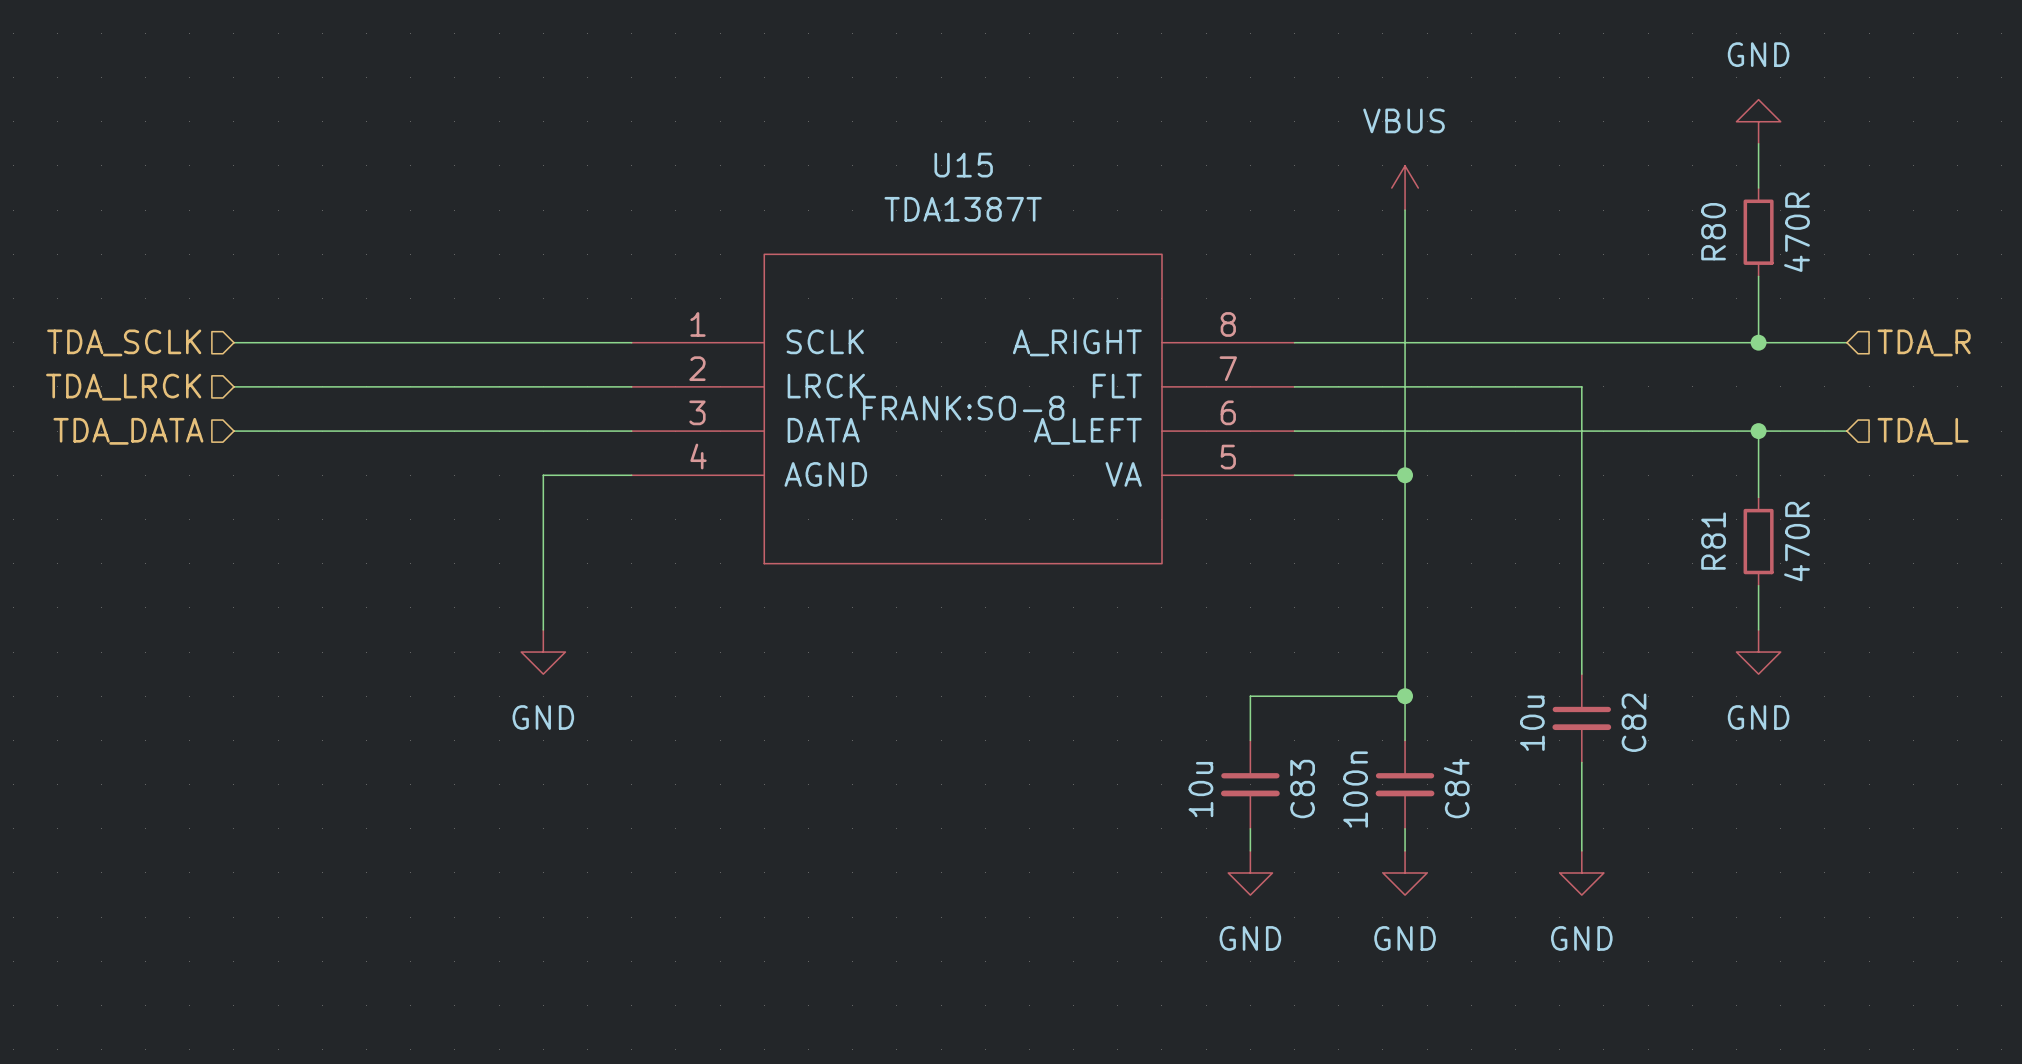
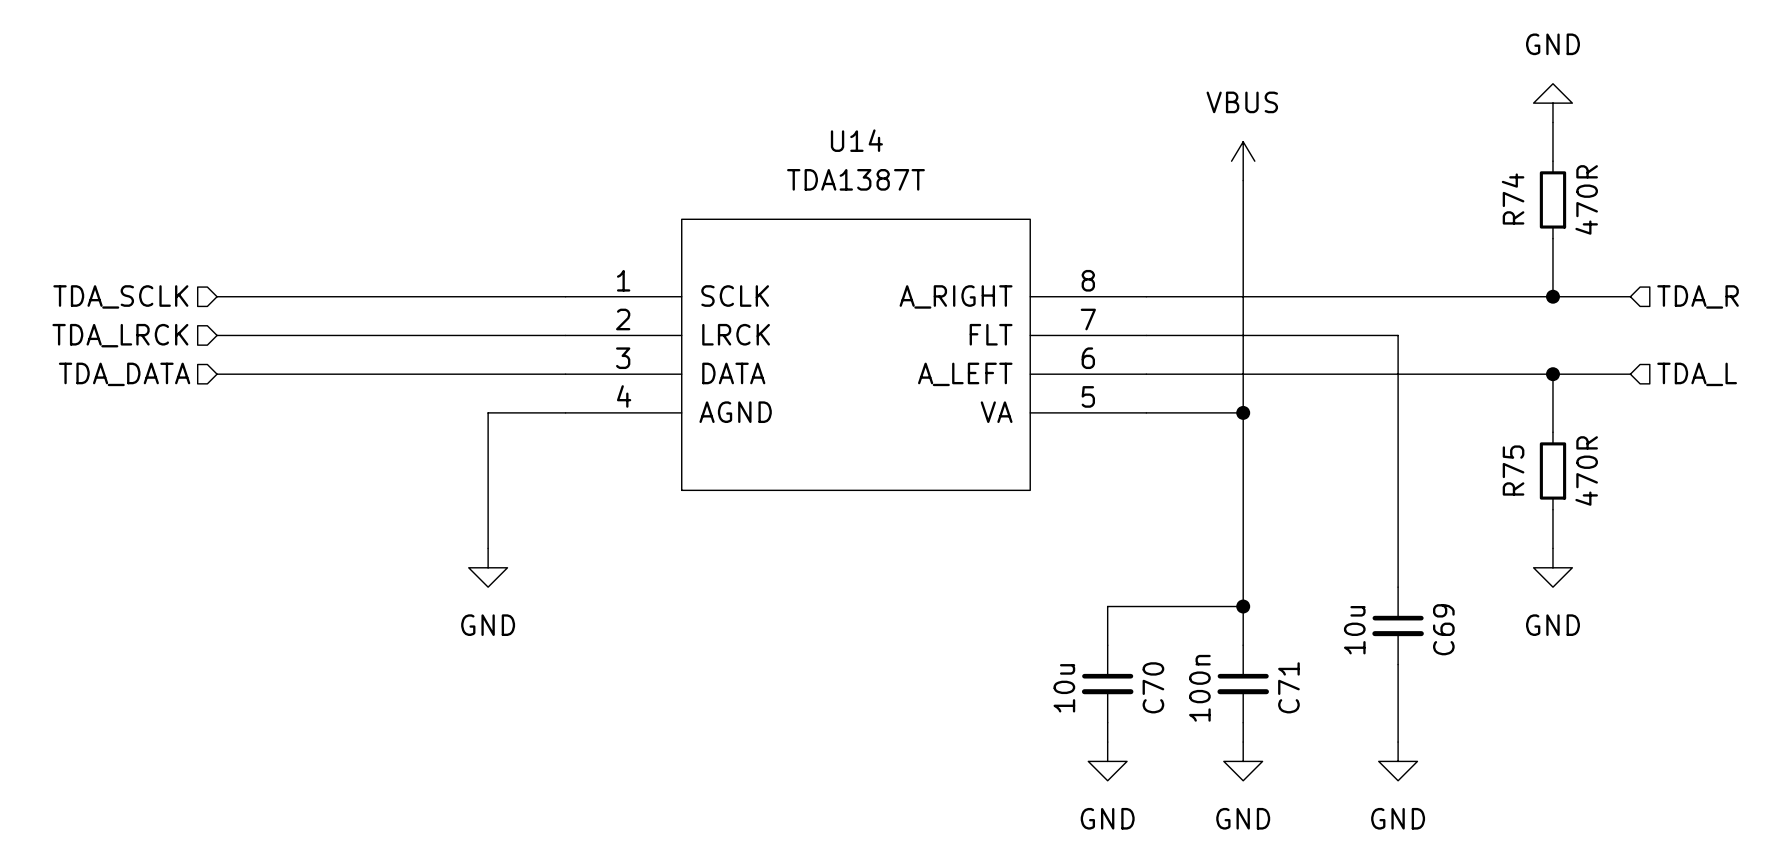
U15 name: U15 (963, 165) -> U14 (856, 140)
R80 name: R80 (1713, 231) -> R74 (1513, 199)
U15 text: FRANK:SO-8 (963, 408) -> none
R81 name: R81 (1713, 541) -> R75 (1513, 470)
C82 name: C82 (1634, 722) -> C69 (1443, 629)
C84 name: C84 (1456, 788) -> C71 (1288, 687)
C83 name: C83 (1302, 789) -> C70 (1153, 687)

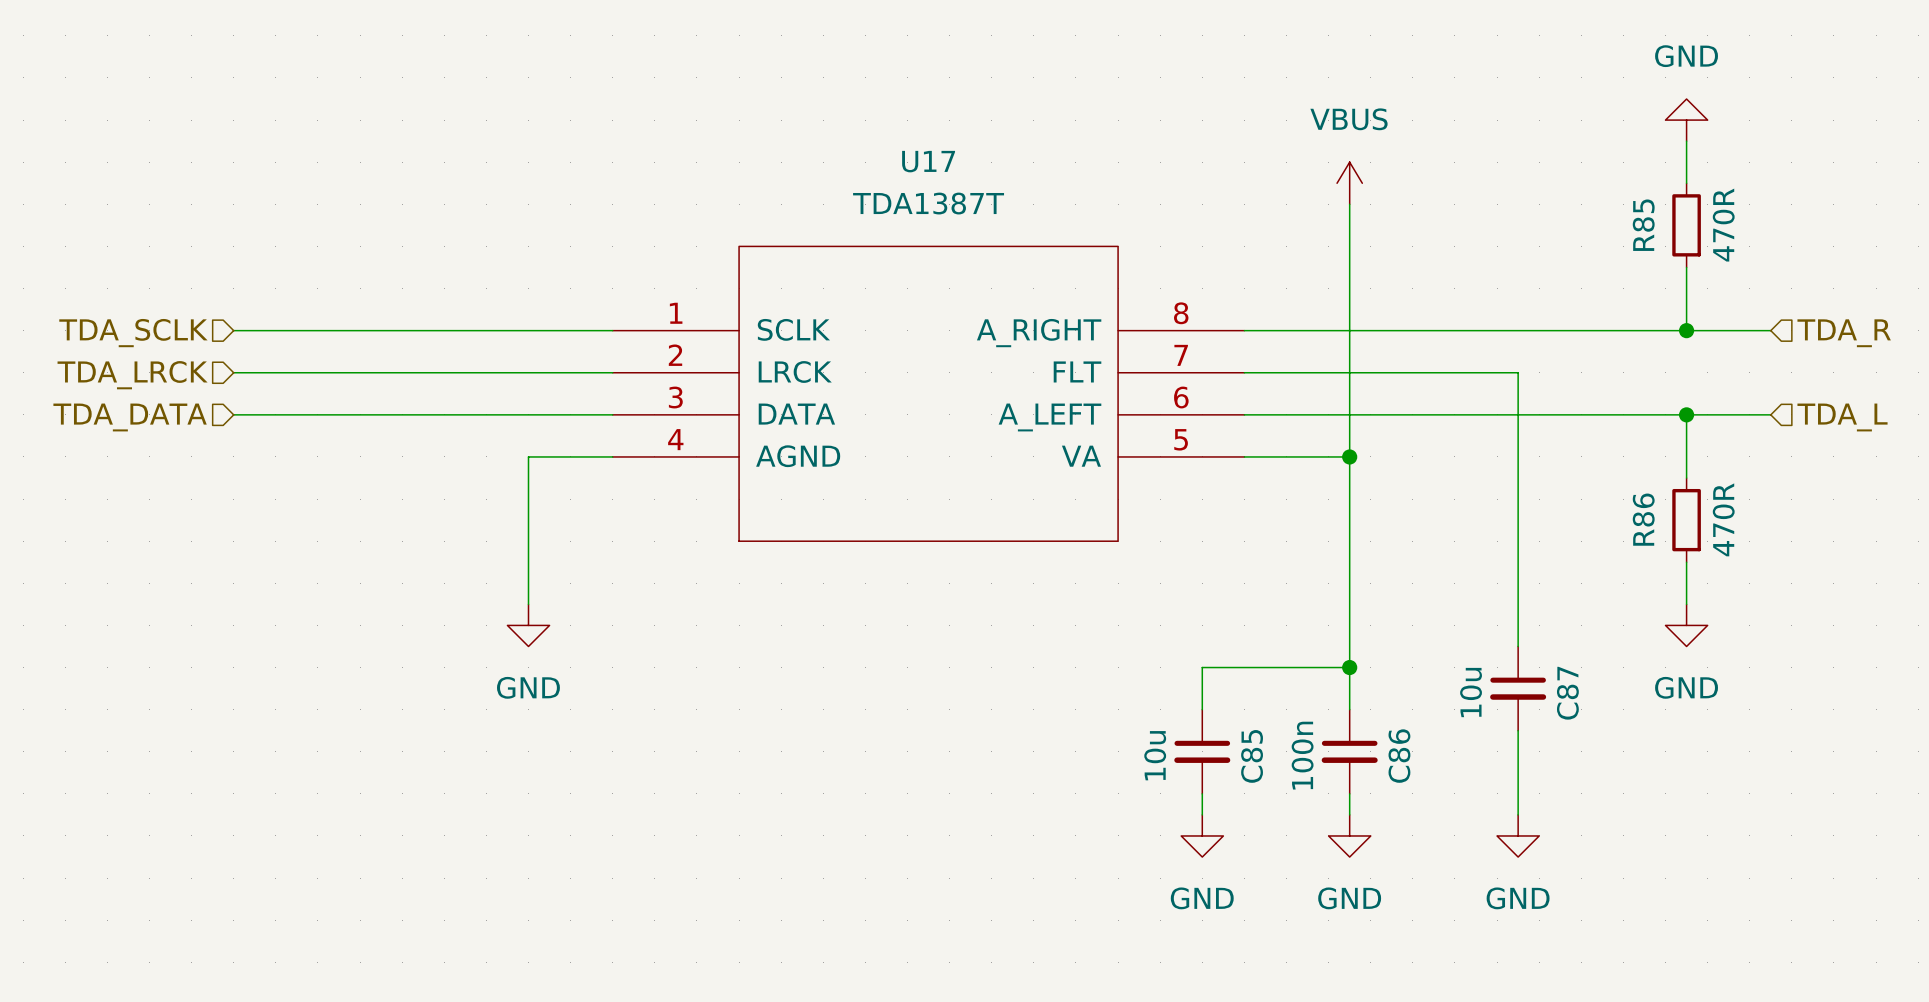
U14 name: U14 (856, 140) -> U17 (928, 161)
R74 name: R74 (1513, 199) -> R85 (1643, 225)
R75 name: R75 (1513, 470) -> R86 (1643, 519)
C69 name: C69 (1443, 629) -> C87 (1567, 693)
C70 name: C70 (1153, 687) -> C85 (1252, 756)
C71 name: C71 (1288, 687) -> C86 (1399, 756)

